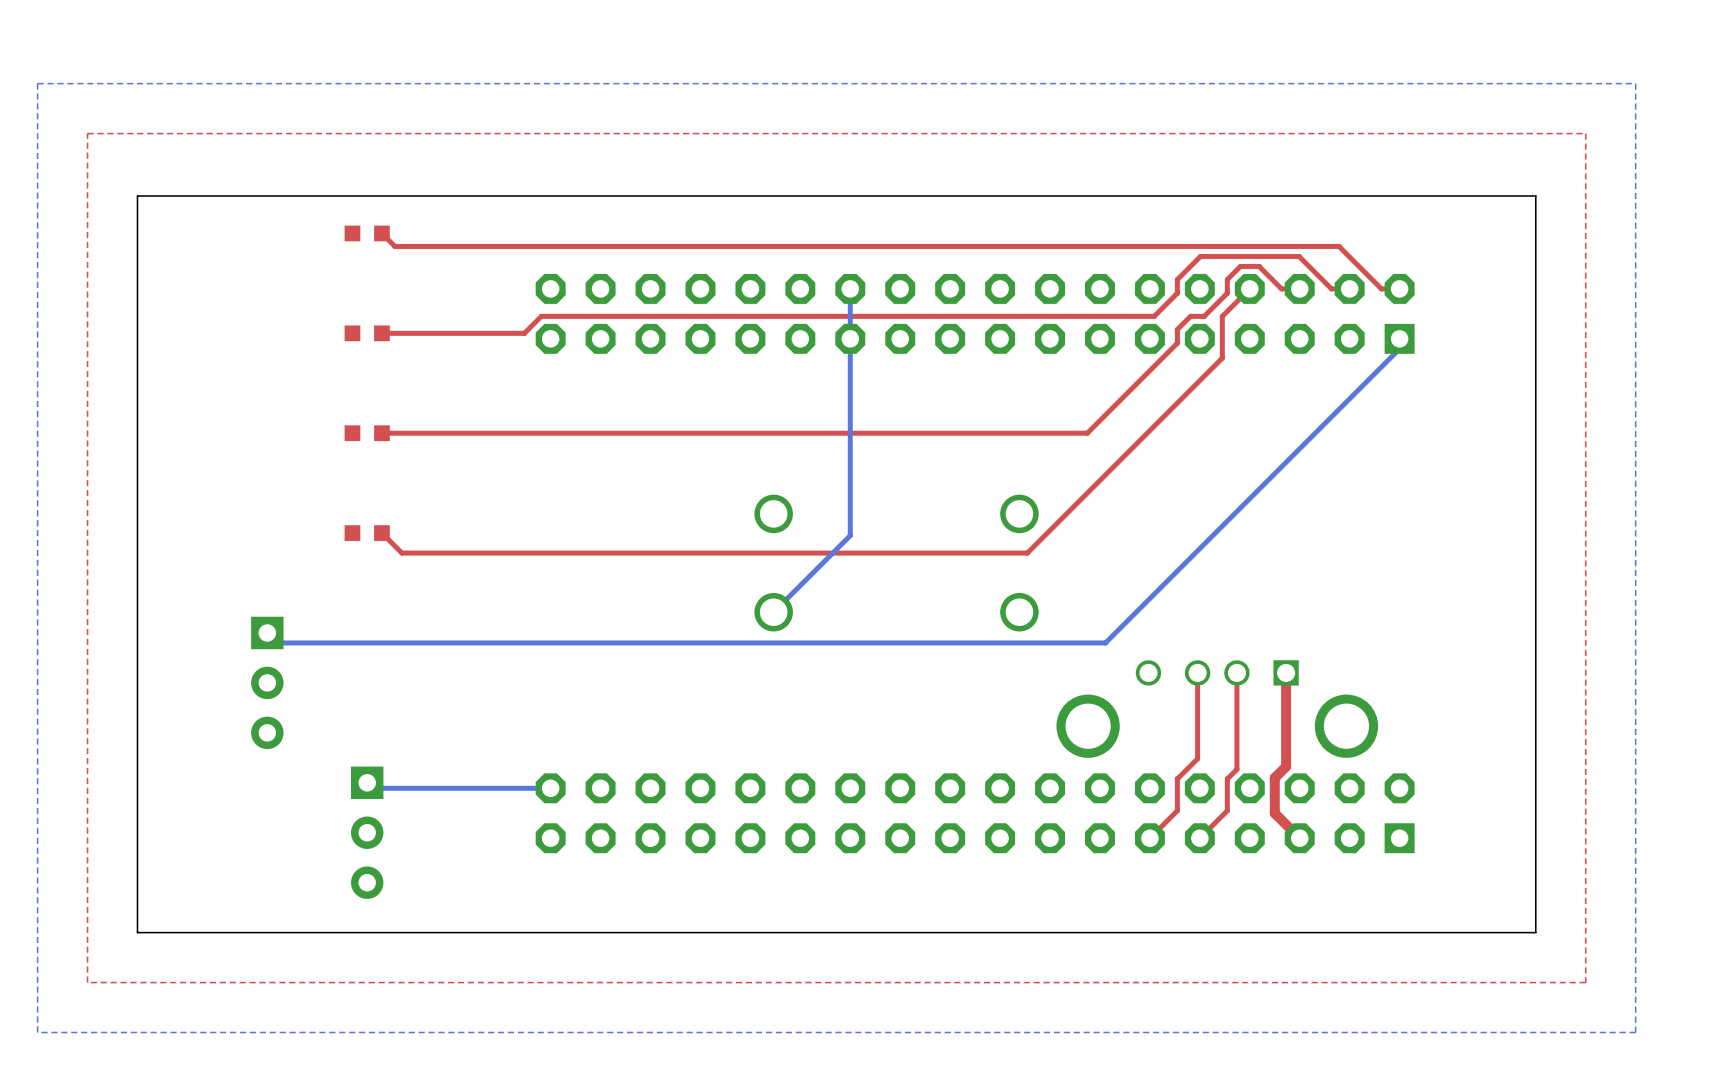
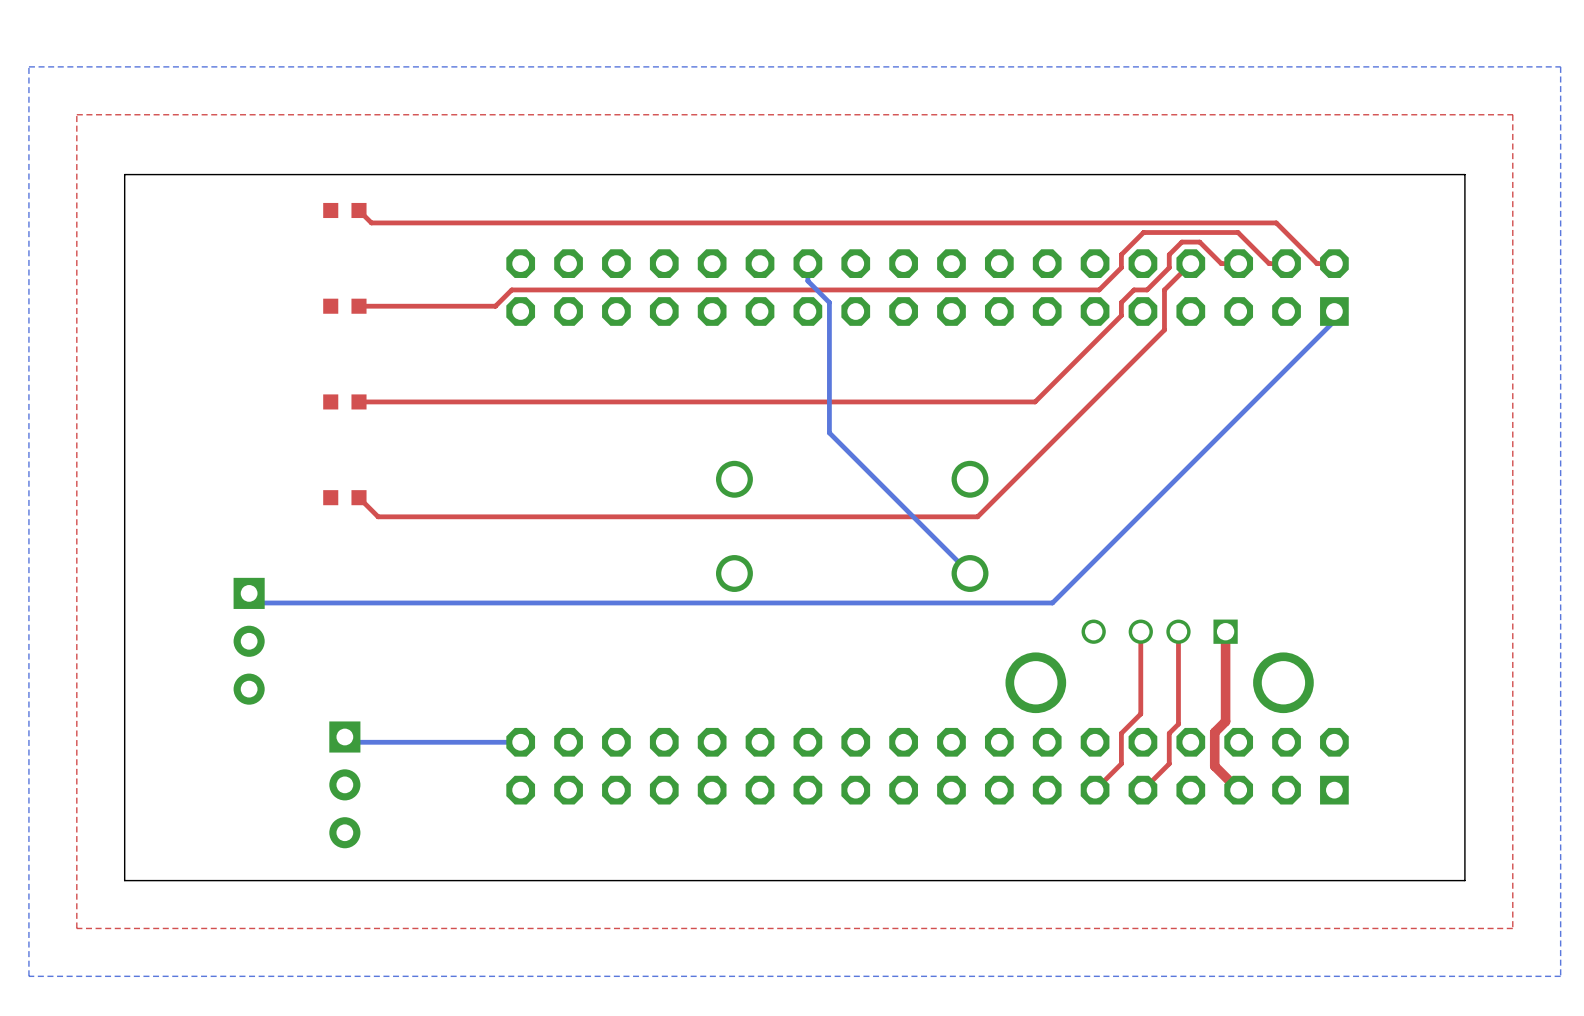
bottom track: (850, 307) (850, 535) (773, 612) -> (807, 281) (829, 302) (829, 432) (970, 573)

